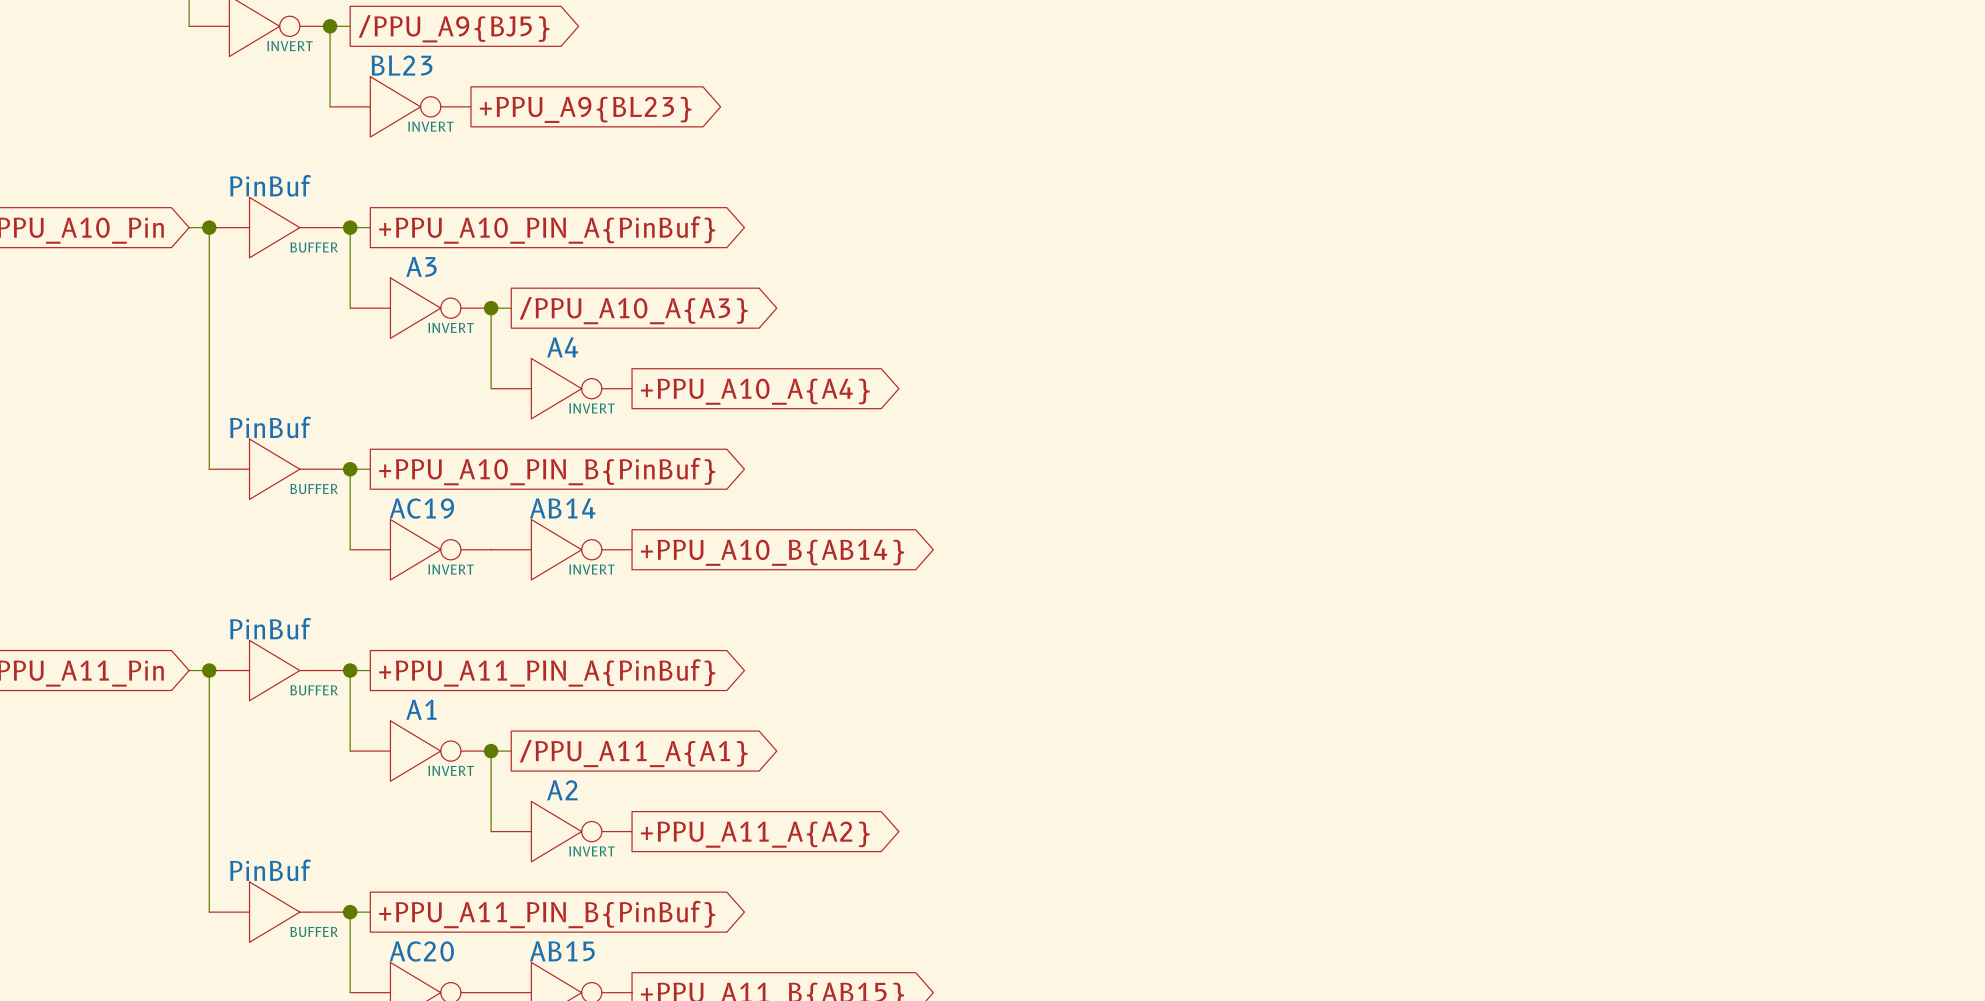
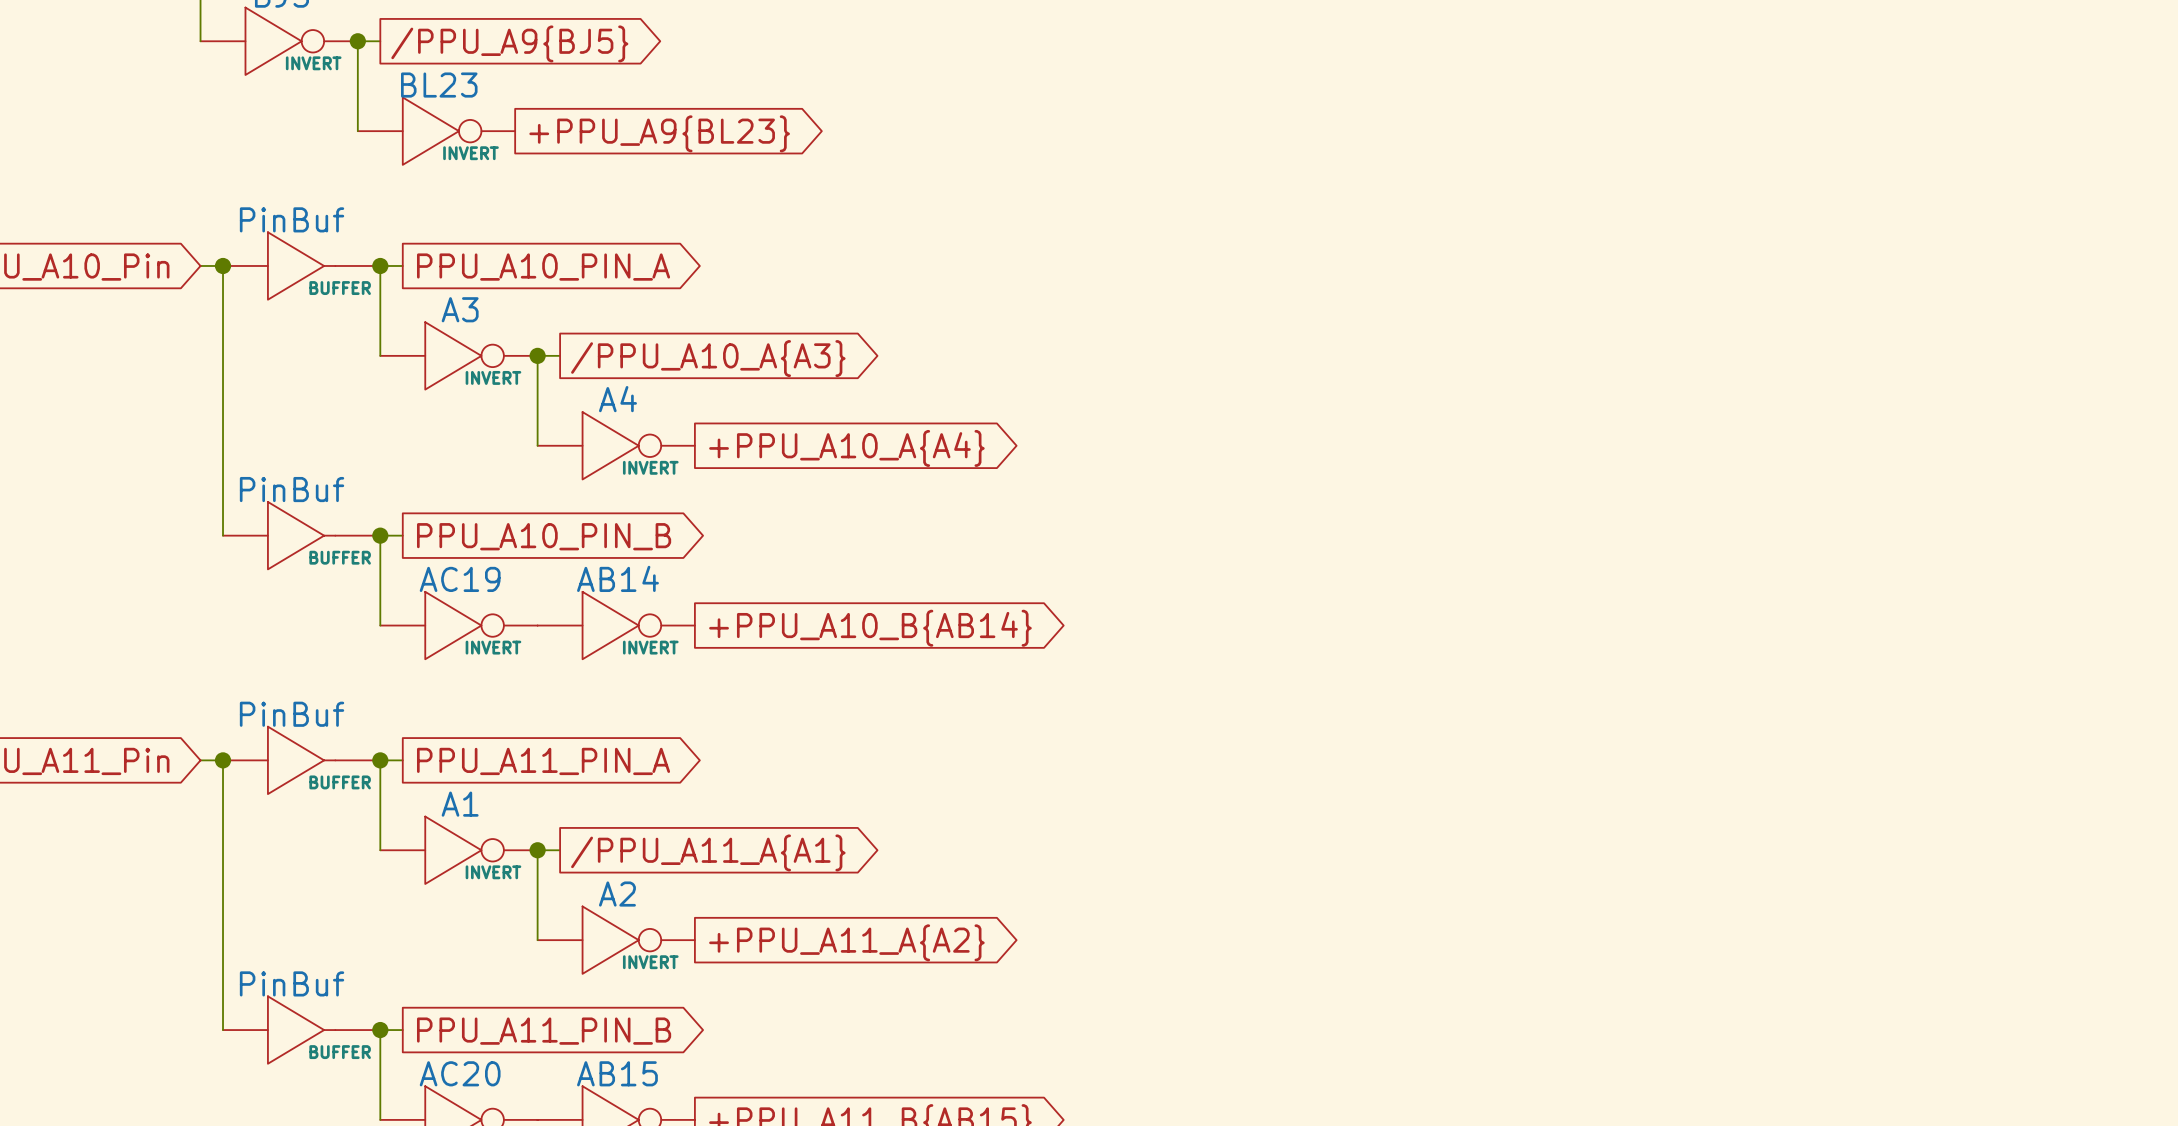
global label: +PPU_A10_PIN_A{PinBuf} (547, 230) -> PPU_A10_PIN_A (543, 267)
global label: +PPU_A10_PIN_B{PinBuf} (547, 471) -> PPU_A10_PIN_B (544, 536)
global label: +PPU_A11_PIN_A{PinBuf} (547, 672) -> PPU_A11_PIN_A (543, 761)
global label: +PPU_A11_PIN_B{PinBuf} (547, 914) -> PPU_A11_PIN_B (544, 1031)

